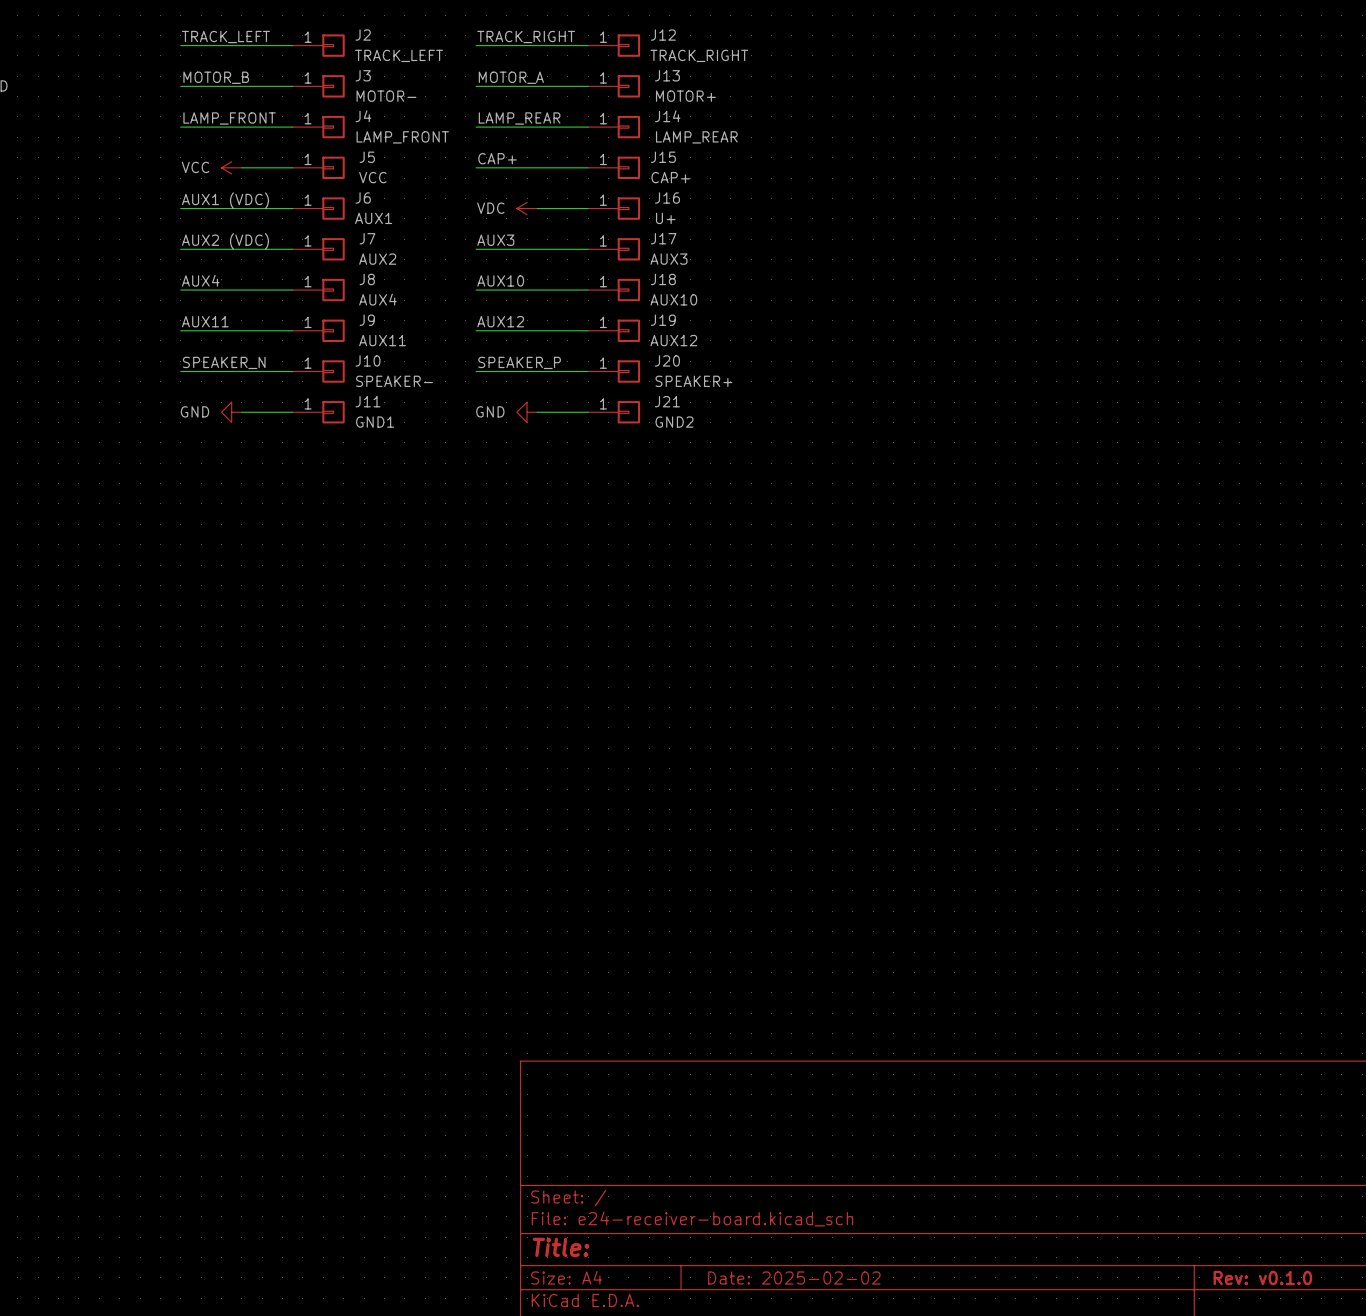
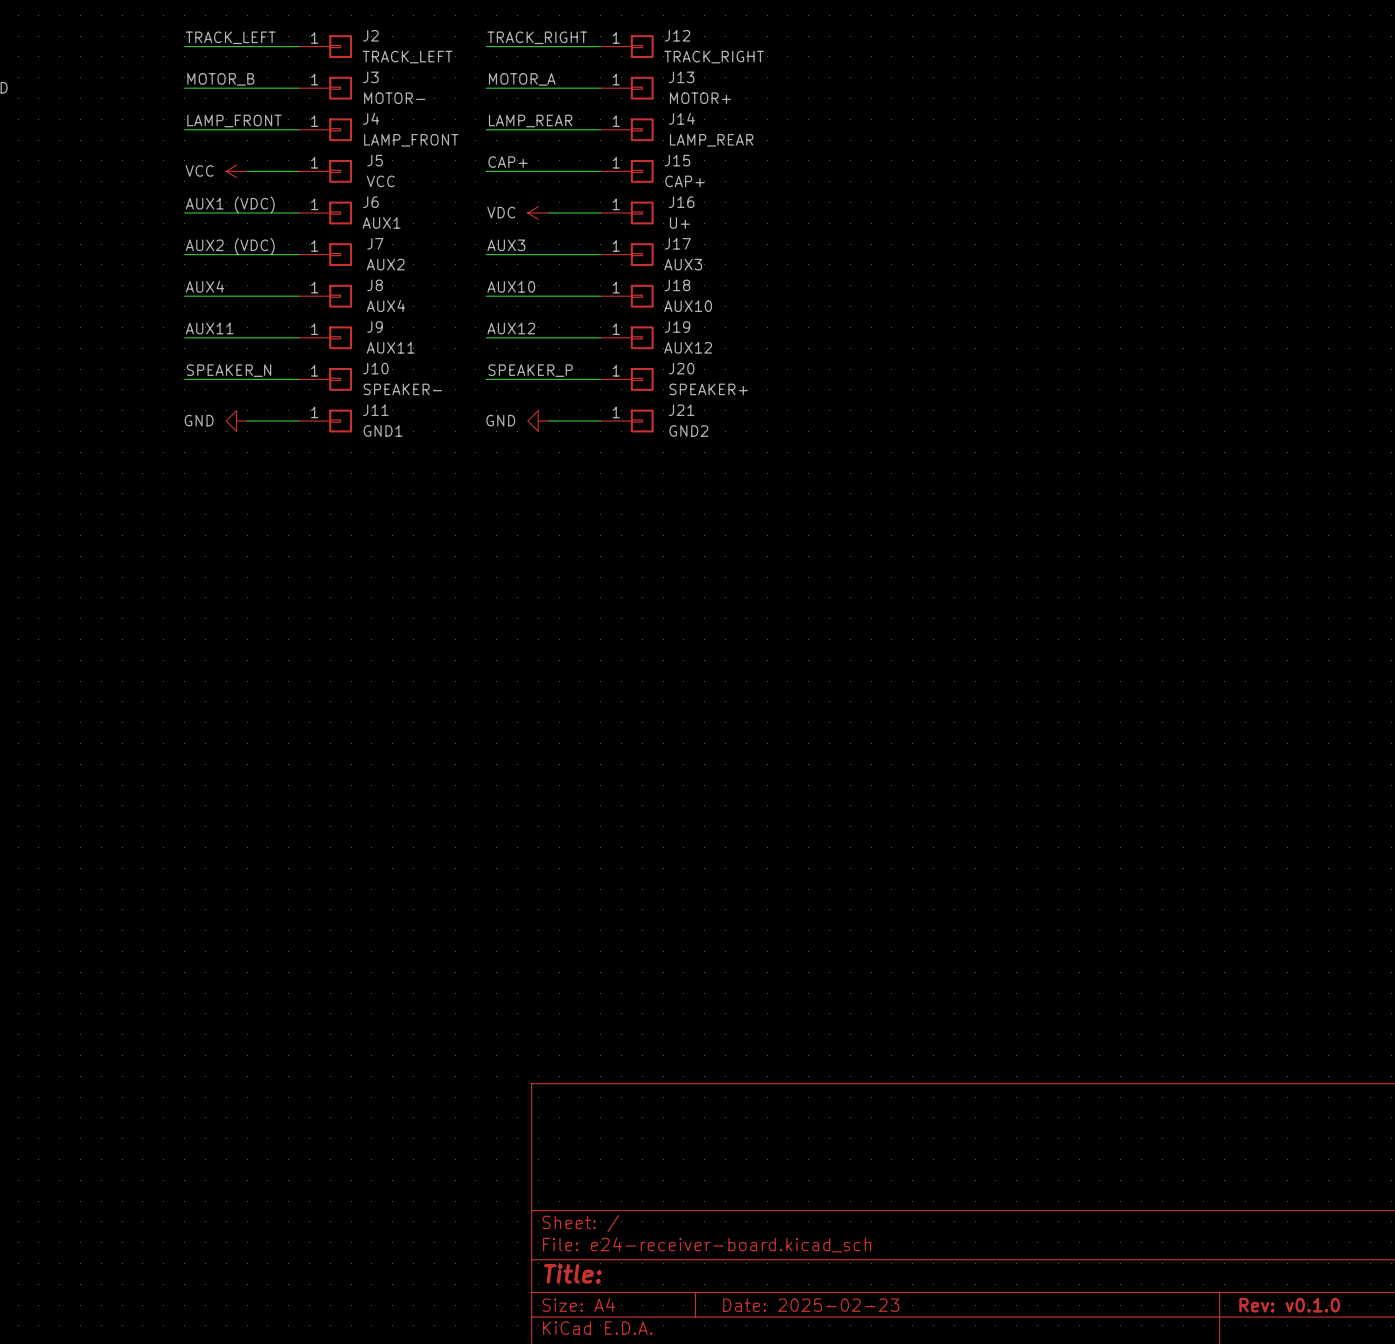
title block: Date: 2025-02-02 (794, 1278) -> Date: 2025-02-23 (811, 1305)

